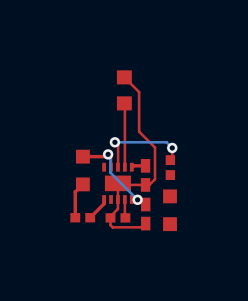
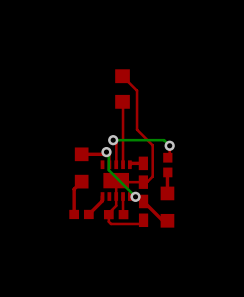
top track: none -> (167, 172) (167, 193)
top track: none -> (143, 201) (162, 220) (167, 220)

